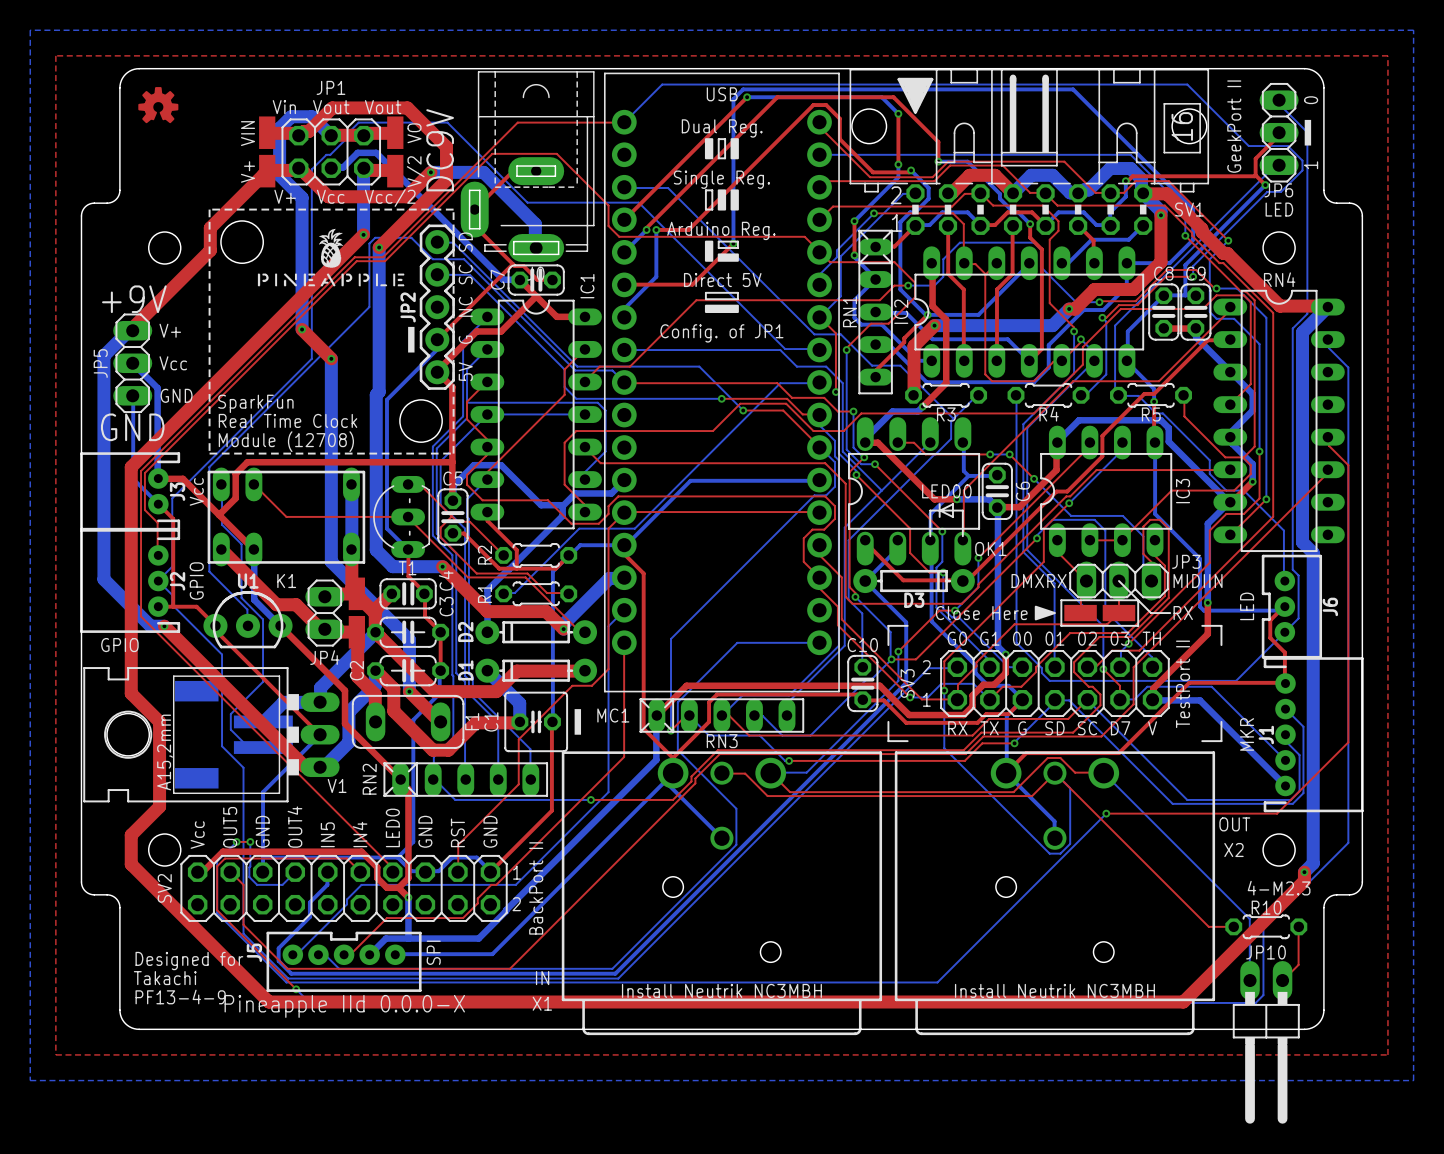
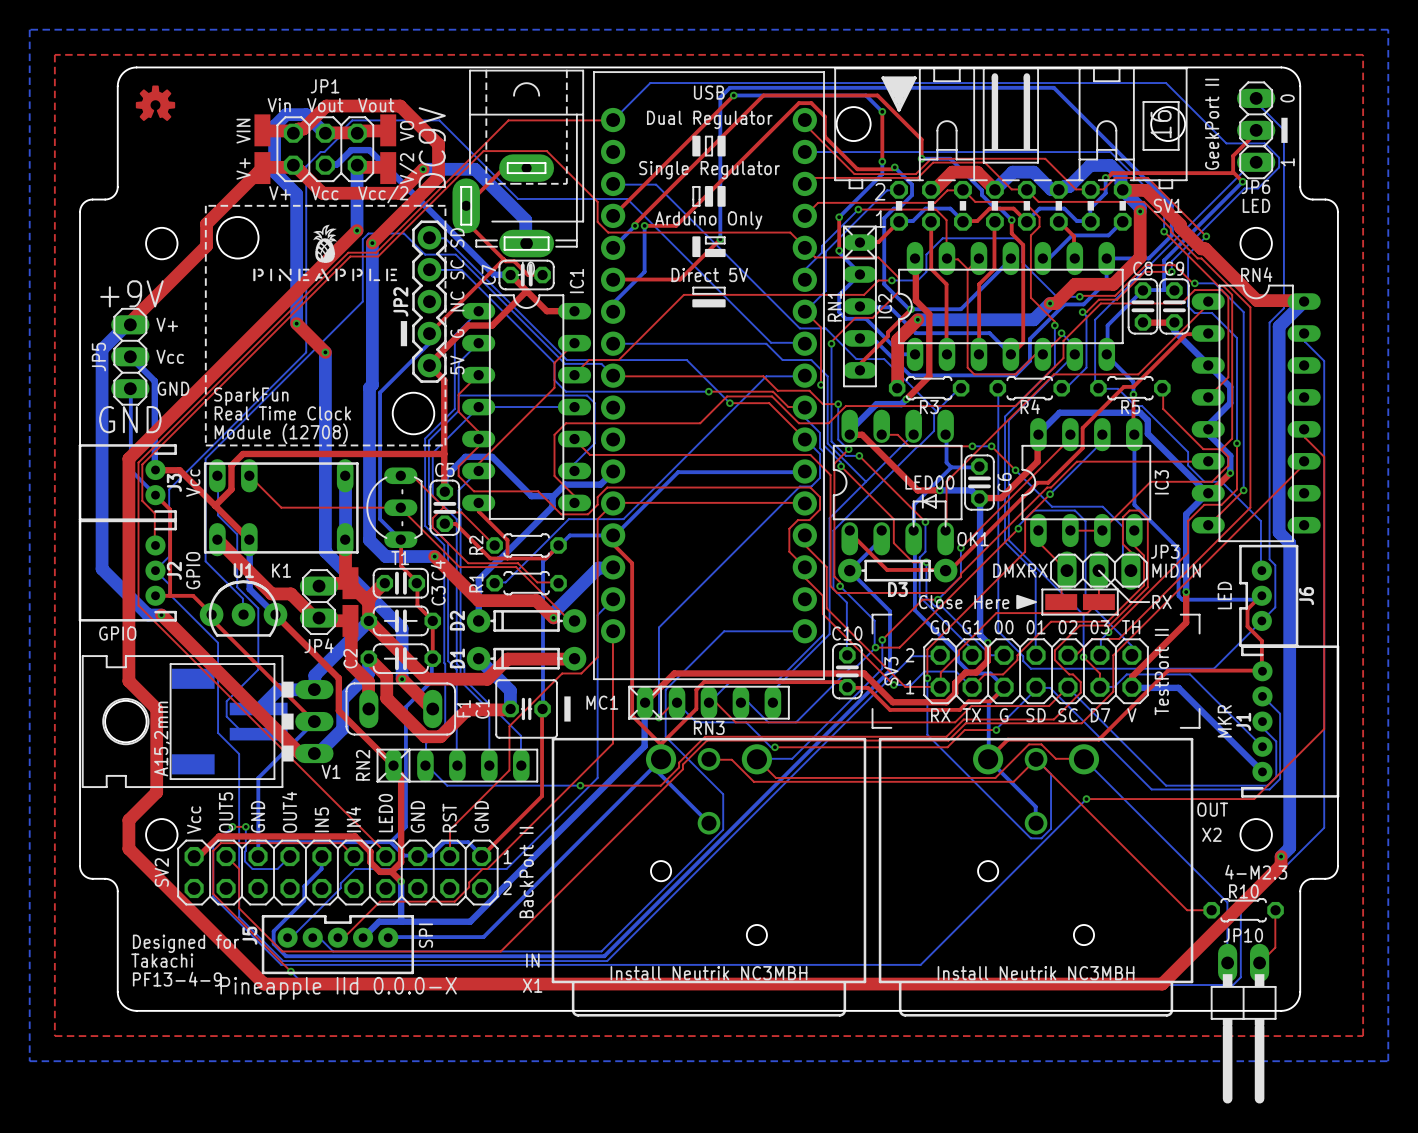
text: Dual Reg. (722, 128) -> Dual Regulator (709, 119)
text: Single Reg. (721, 179) -> Single Regulator (709, 170)
text: Arduino Reg. (721, 230) -> Arduino Only (708, 220)
text: Config. of JP1 (721, 333) -> none

